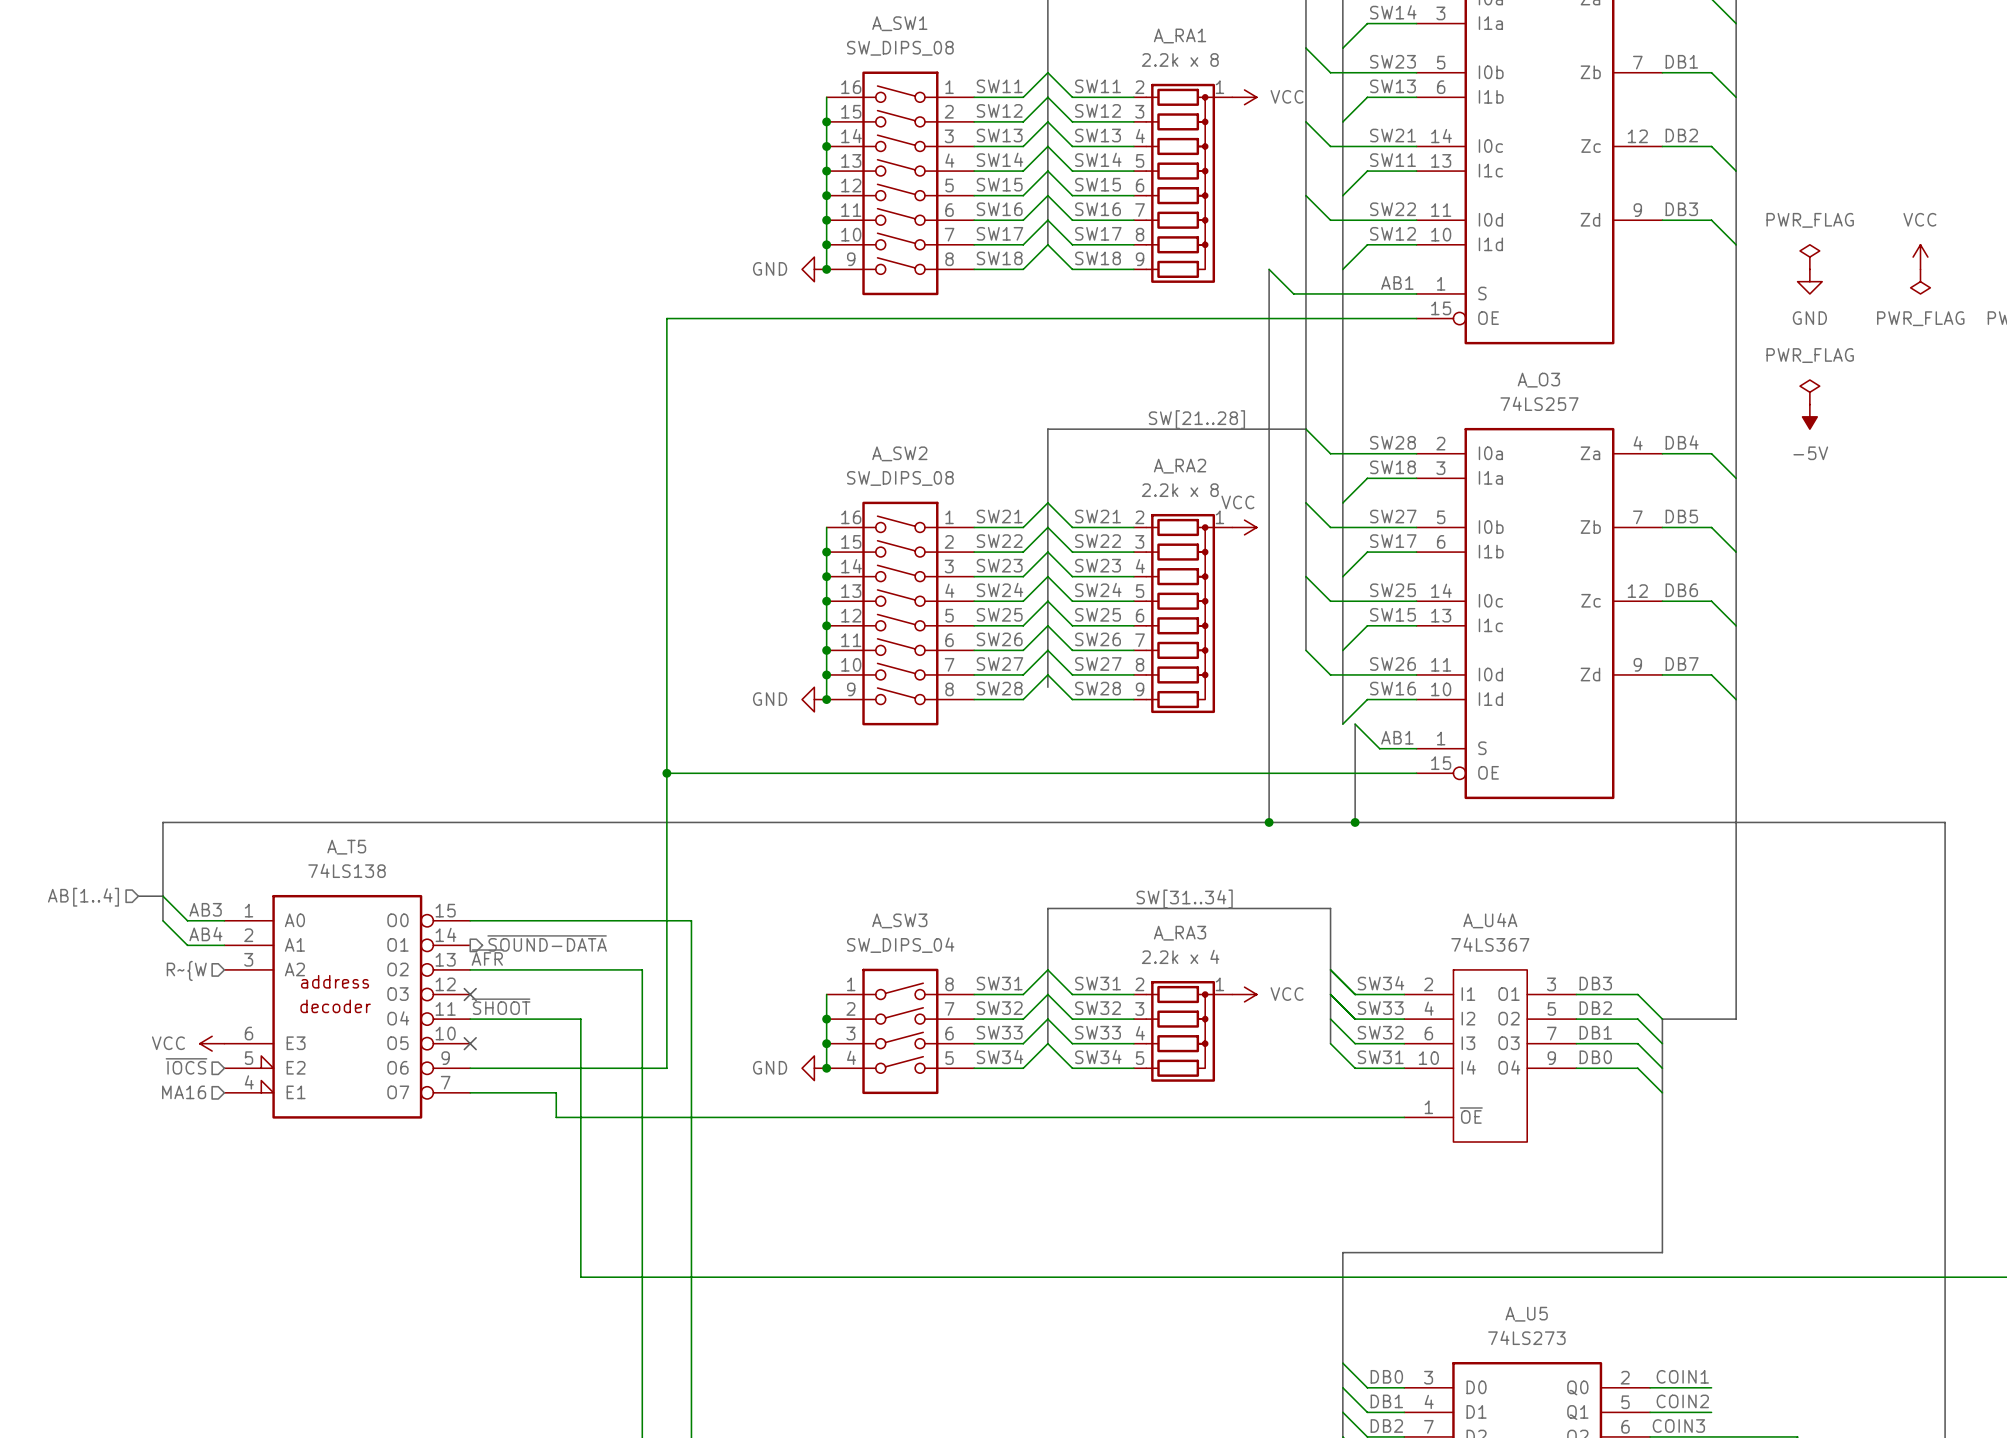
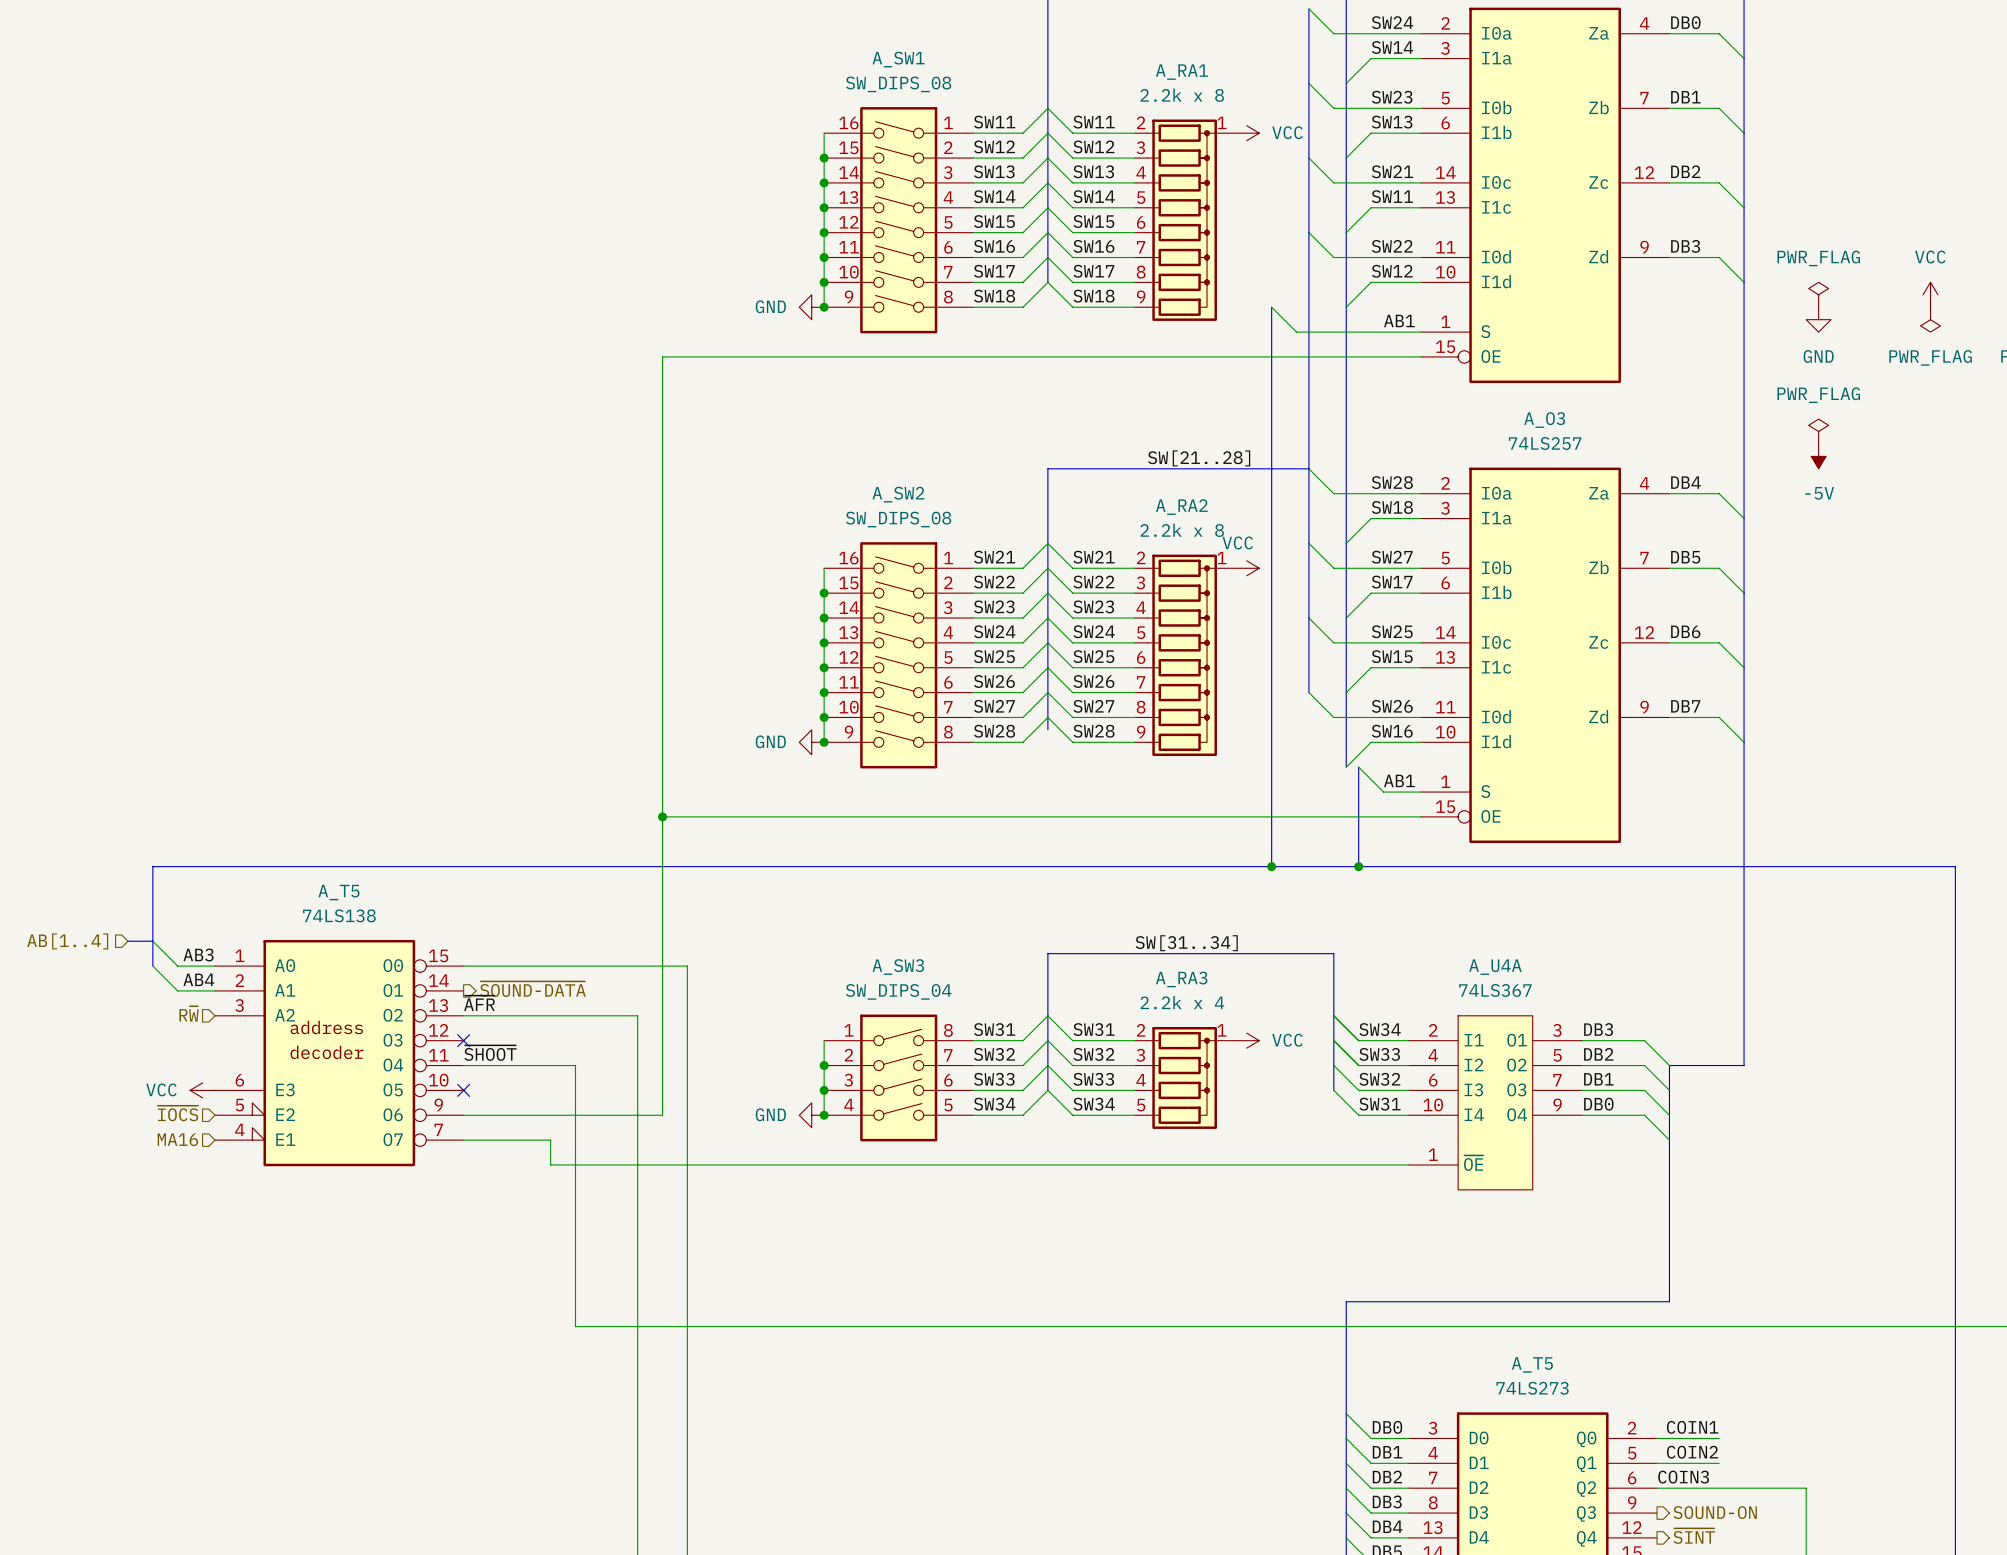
hierarchical label: R~{W (186, 970) -> R~{W} (189, 1013)
A_U5 name: A_U5 (1526, 1314) -> A_T5 (1532, 1364)

